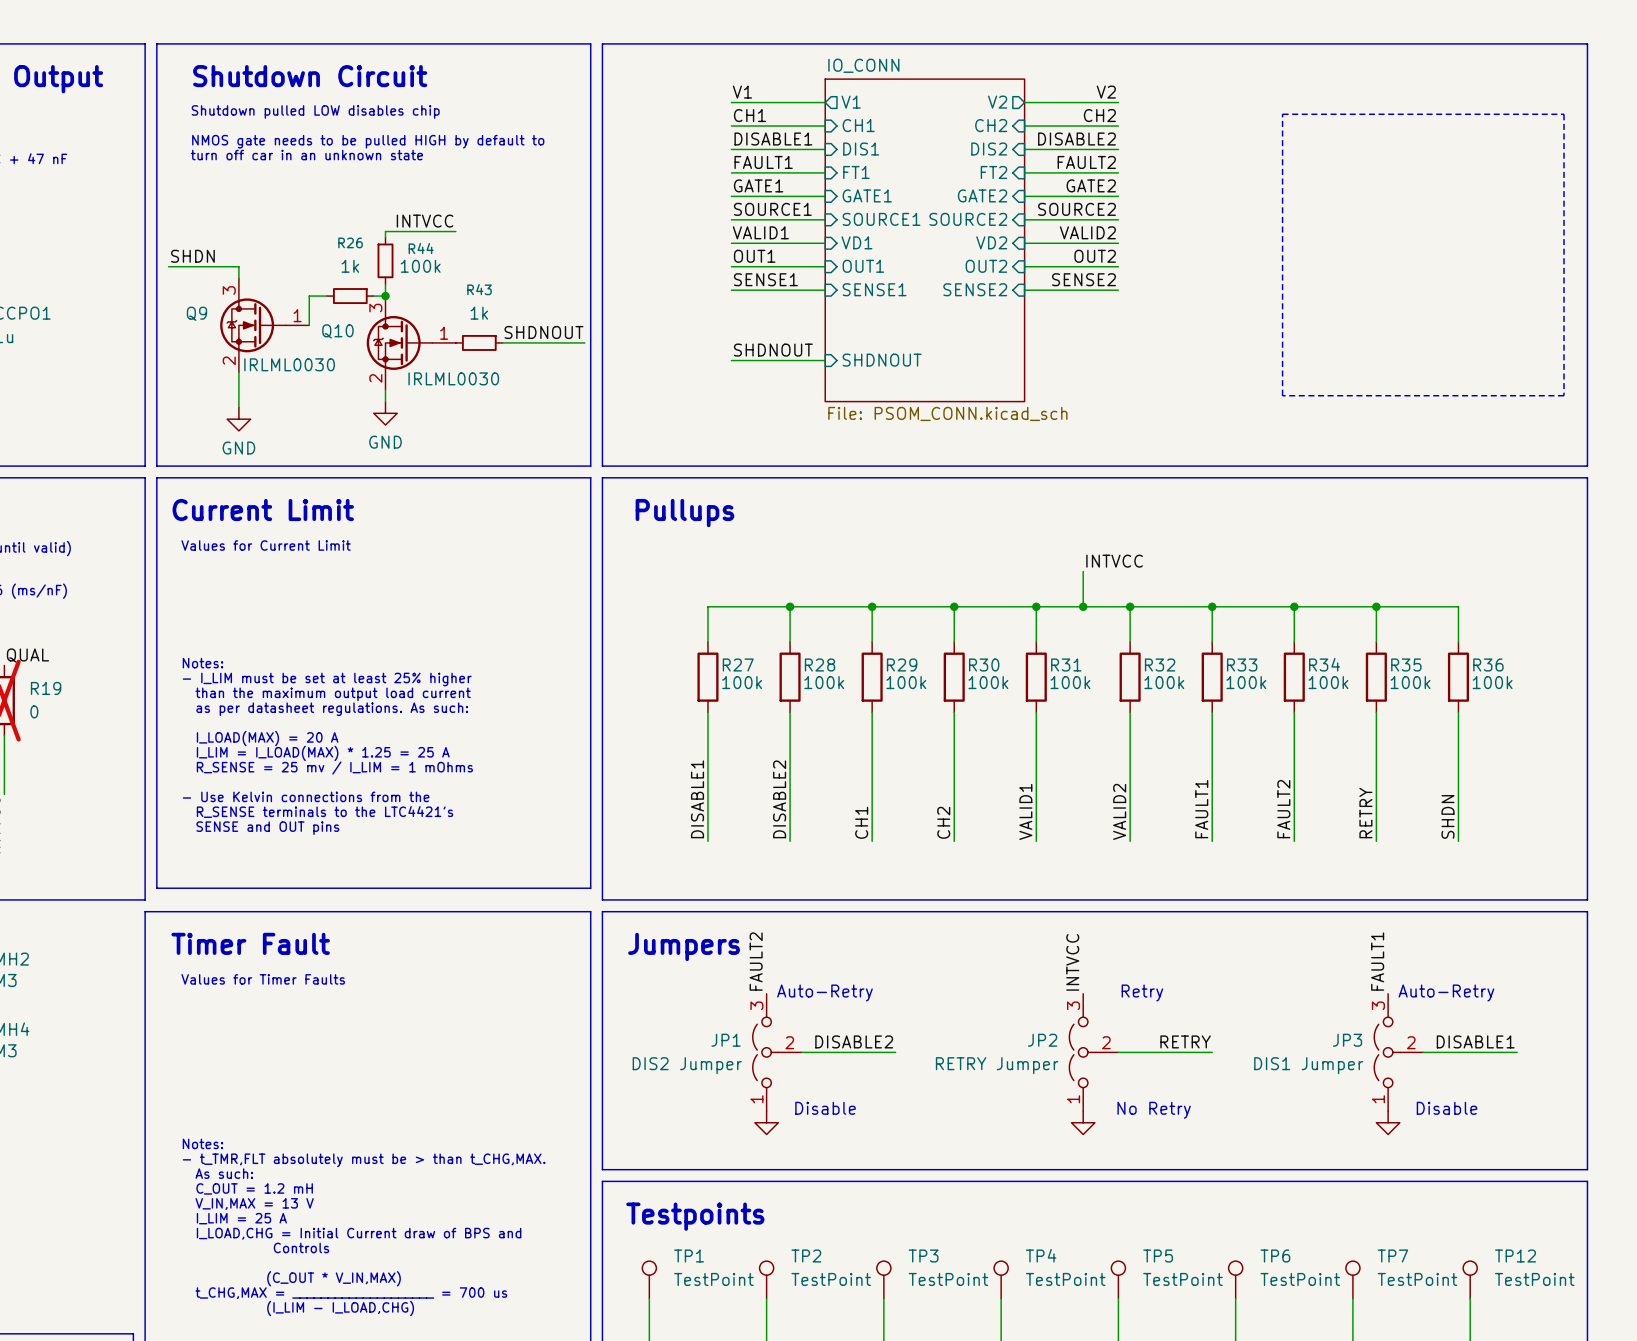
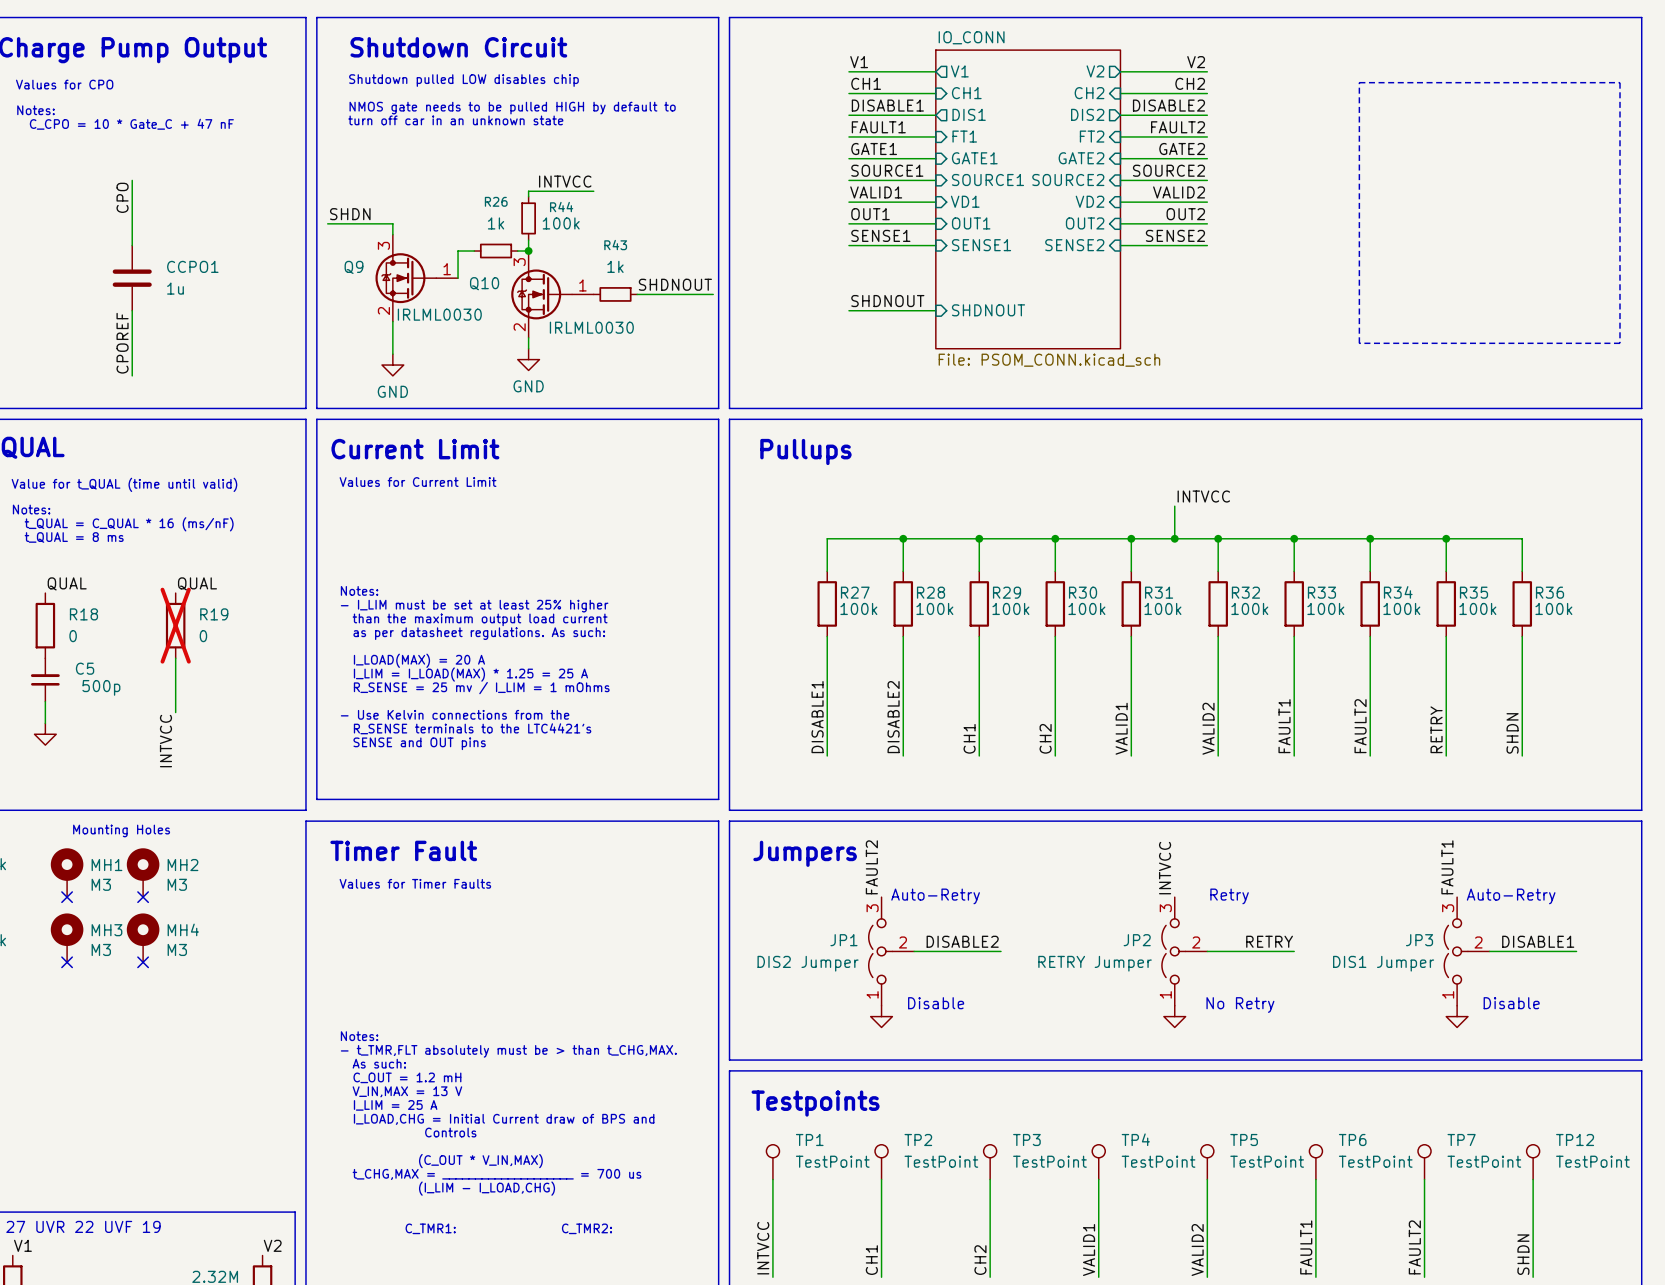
sheet pin shape: input (861, 149) -> output (969, 114)
sheet pin shape: input (989, 149) -> output (1087, 114)

